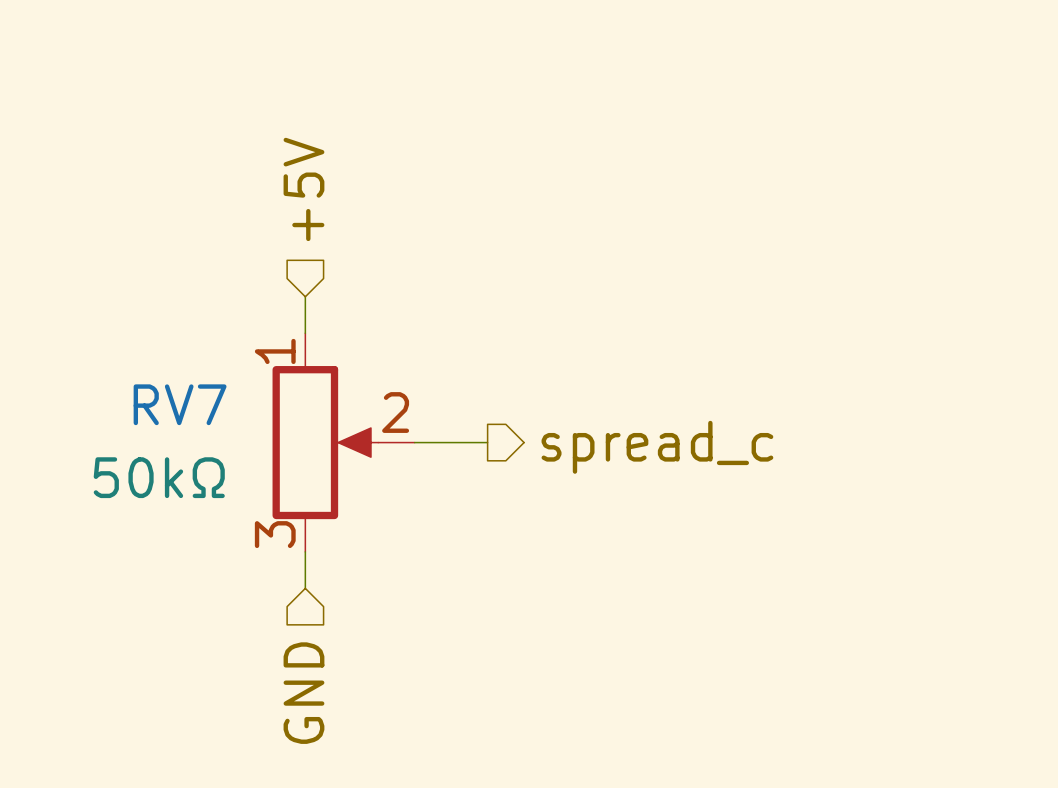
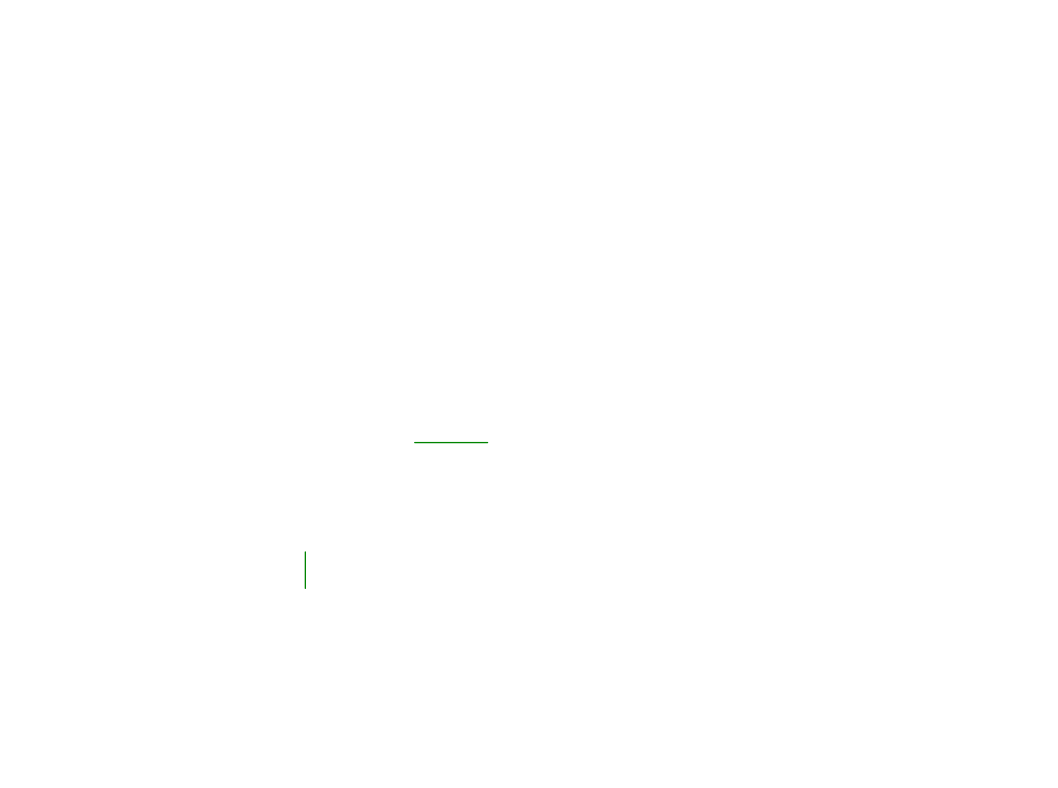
hierarchical label: +5V (303, 189) -> none
wire: (305, 296) (305, 333) -> none
RV7: 50kΩ (343, 442) -> none
hierarchical label: spread_c (657, 447) -> none
hierarchical label: GND (303, 693) -> none

